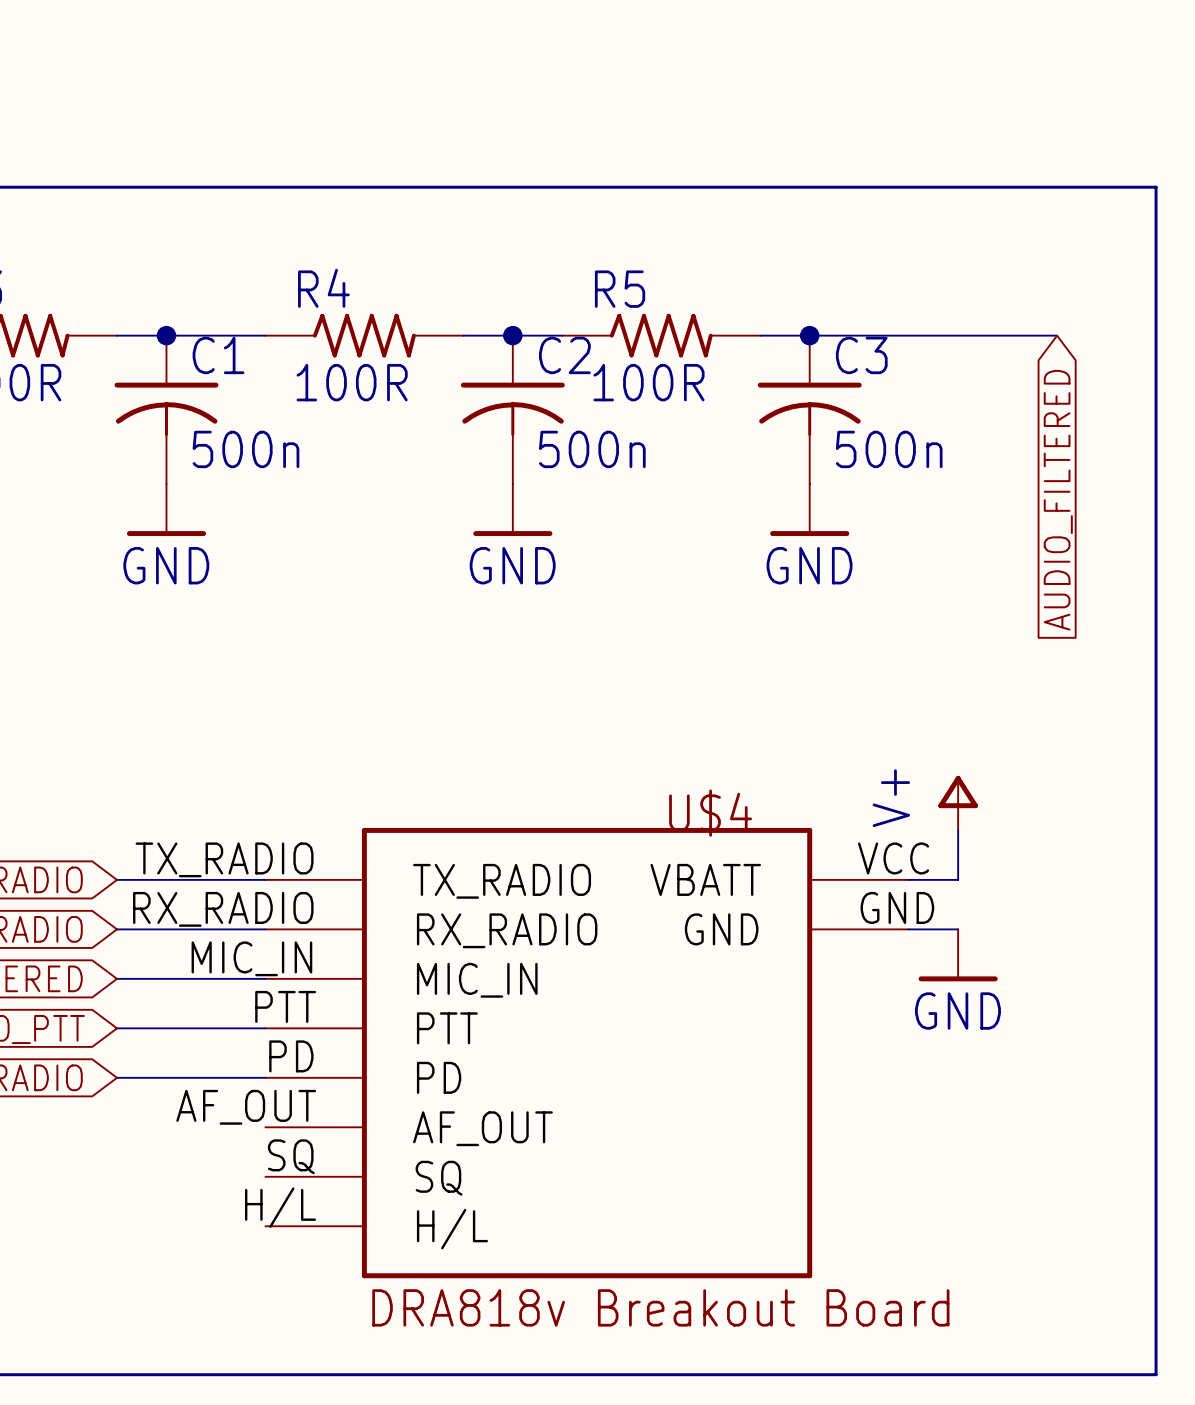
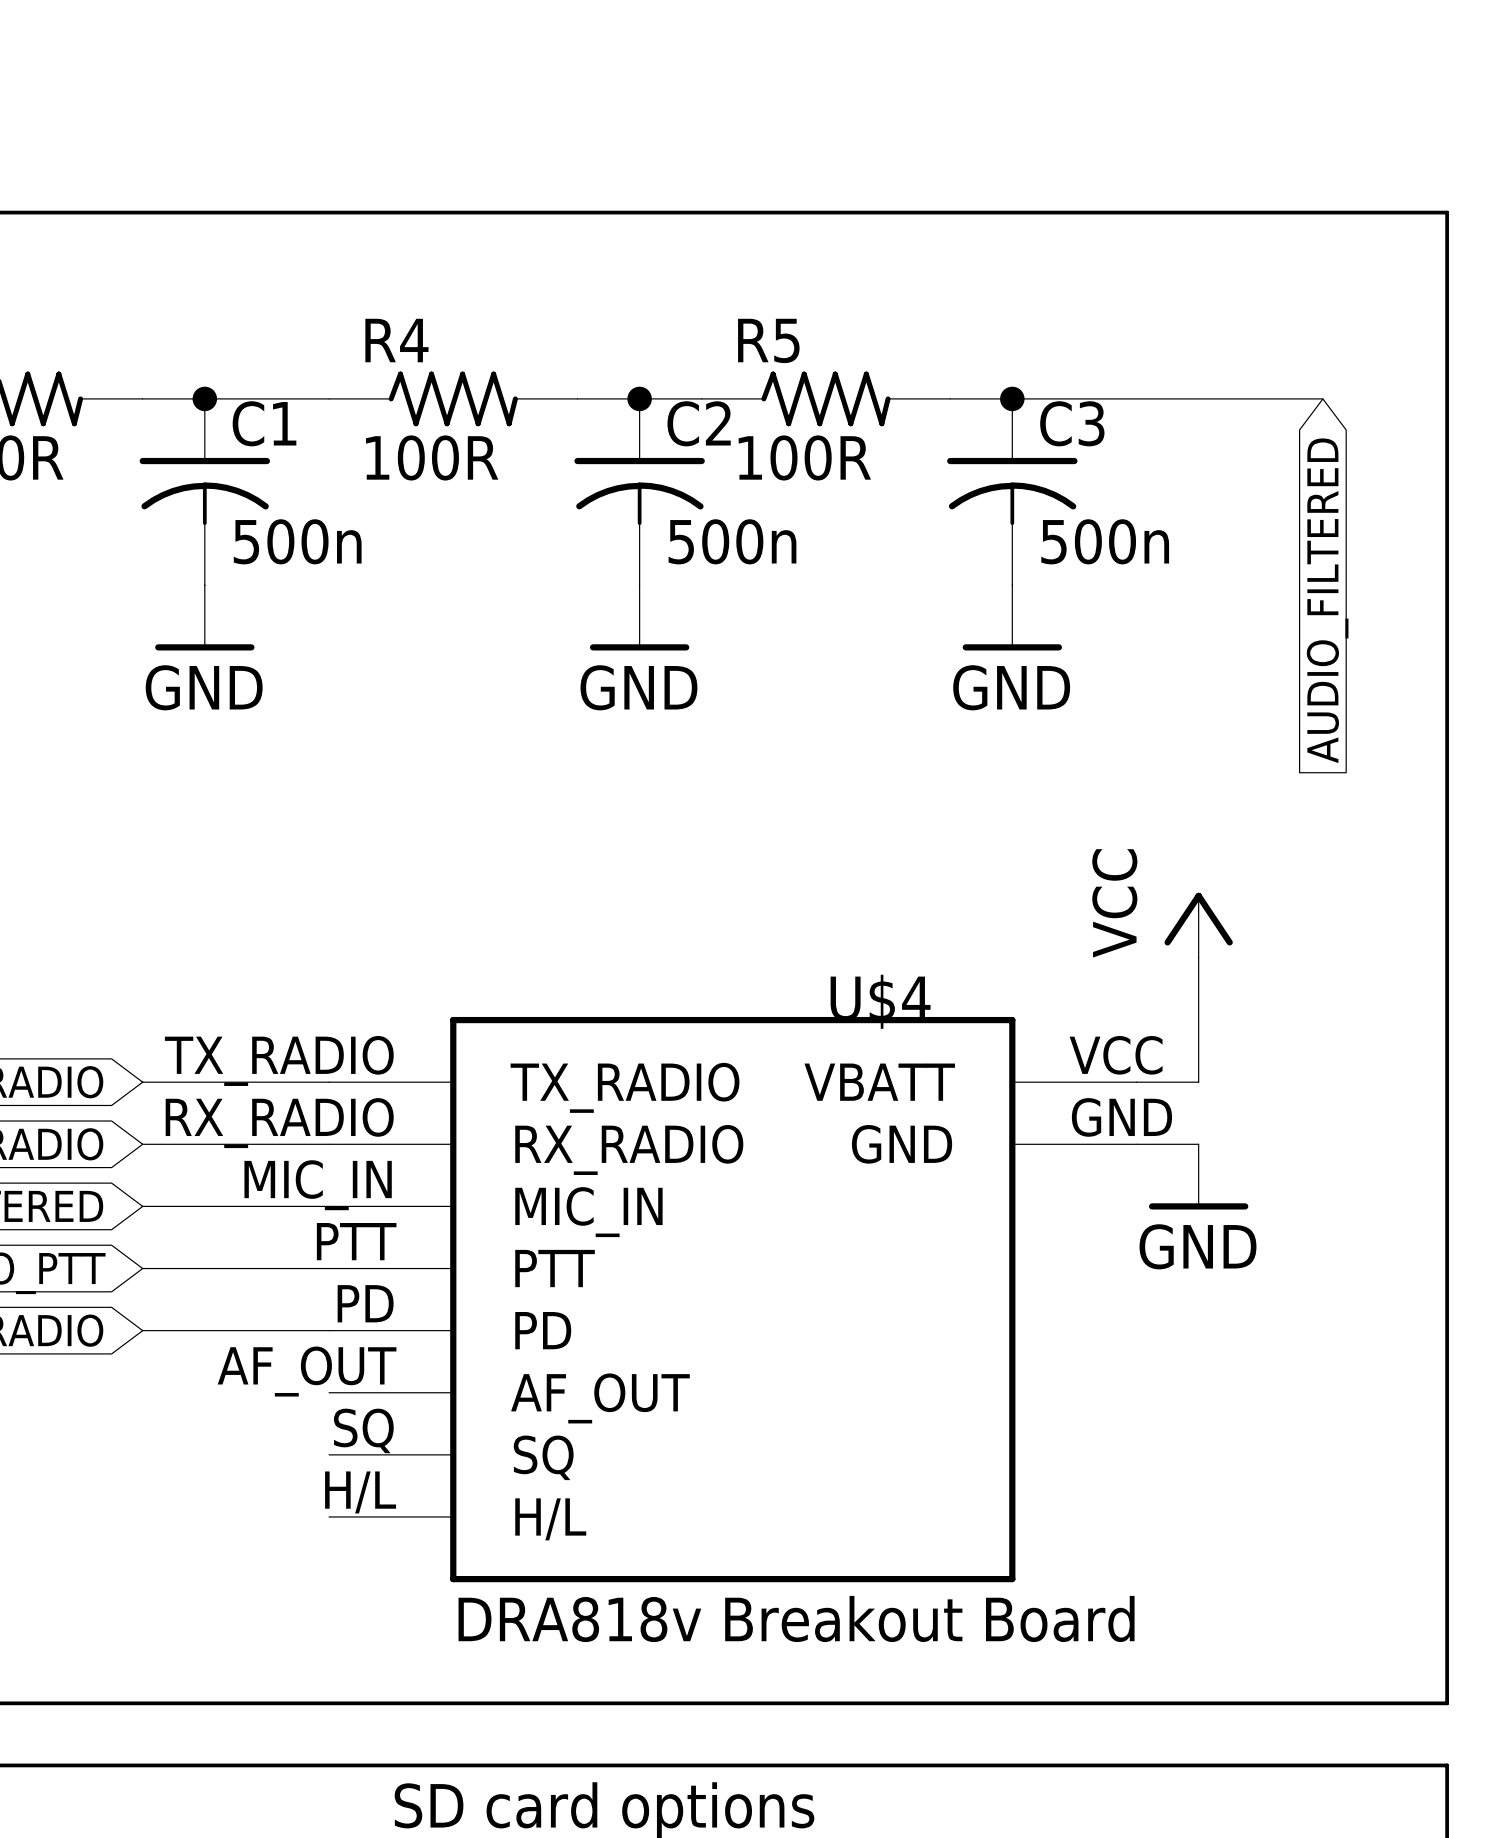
power symbol: none -> VCC (1198, 925)
power symbol: V+ (958, 803) -> none

